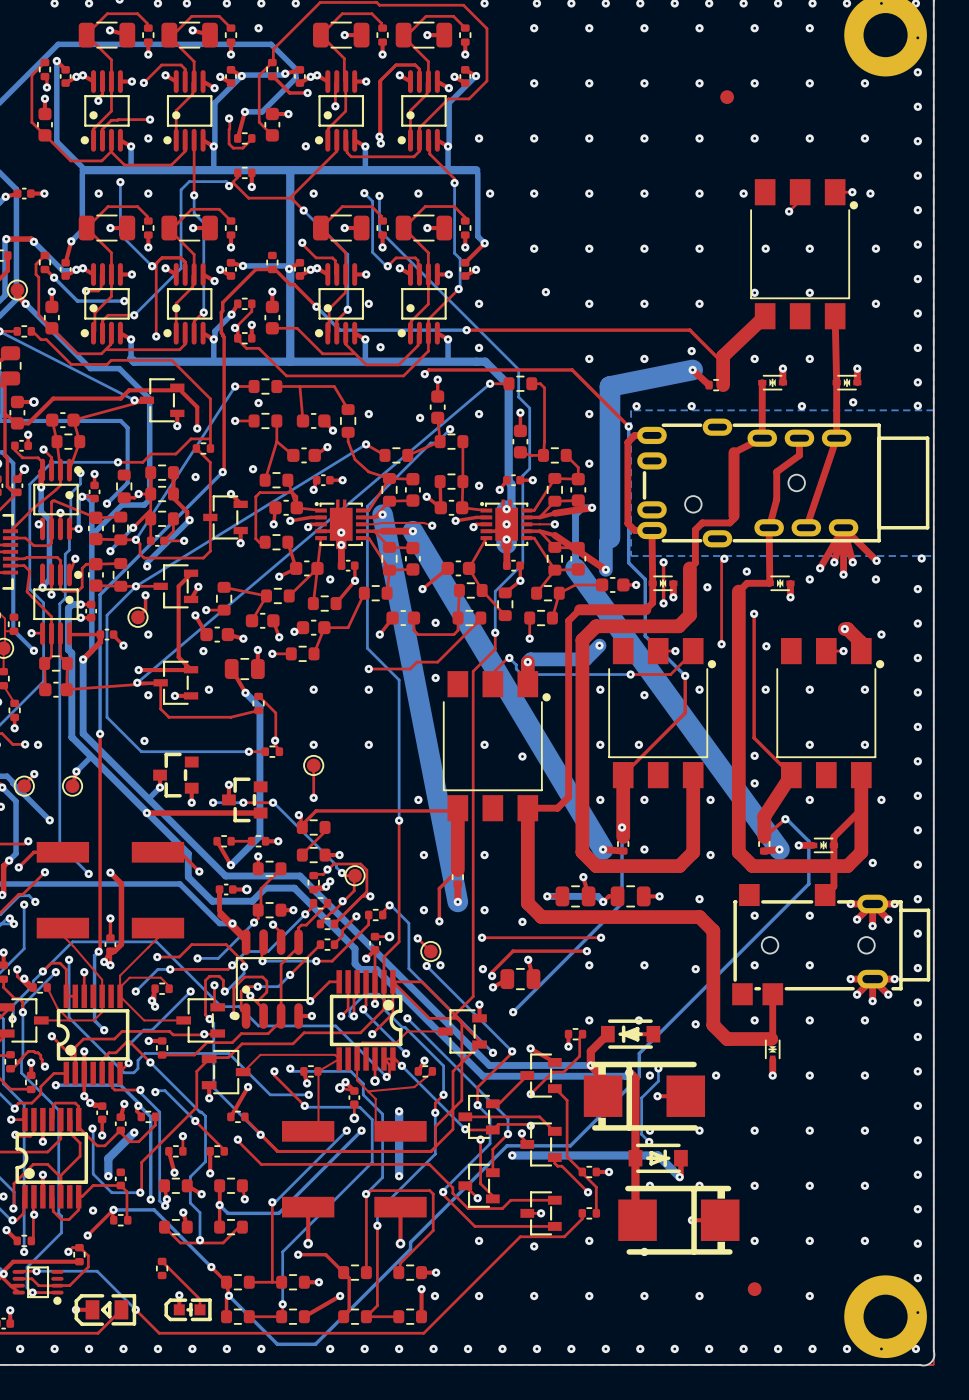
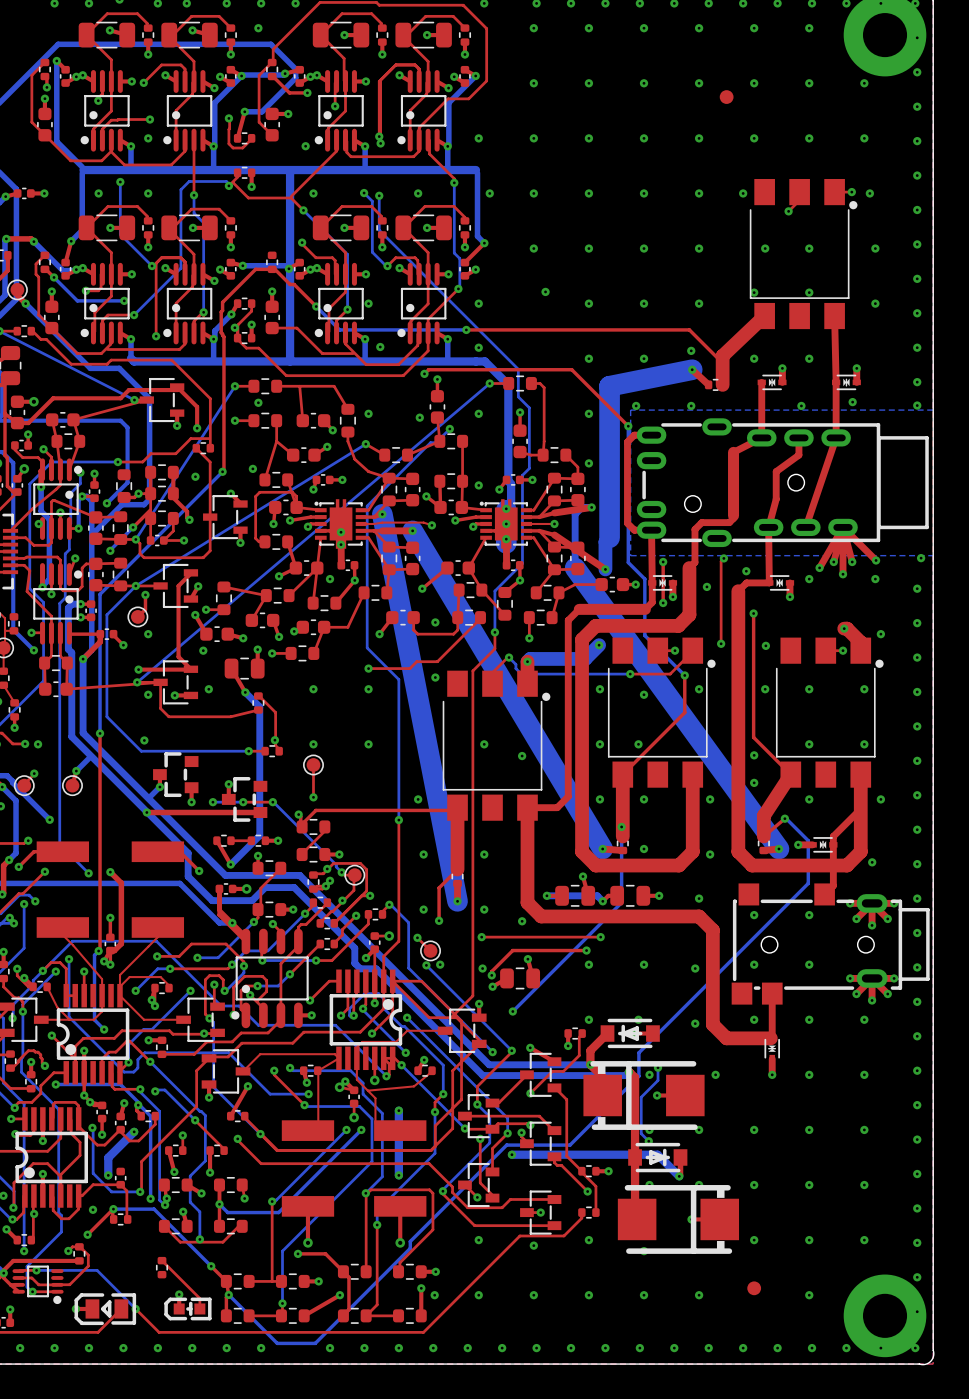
bottom track: (189, 520) (147, 562) (147, 566) -> none
via: (147, 566) -> none

